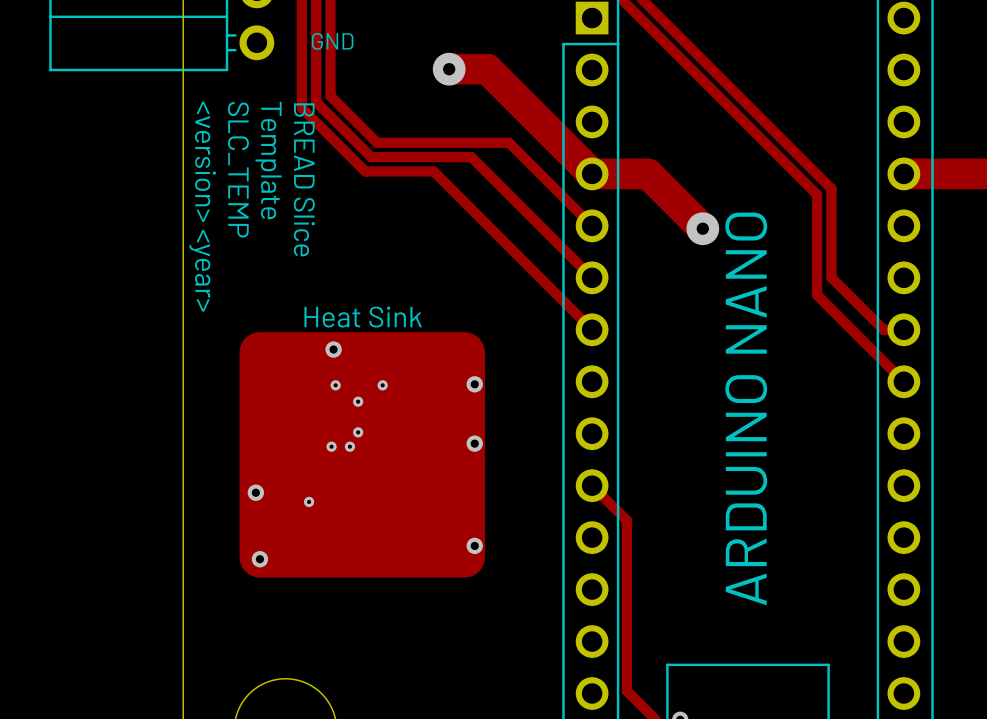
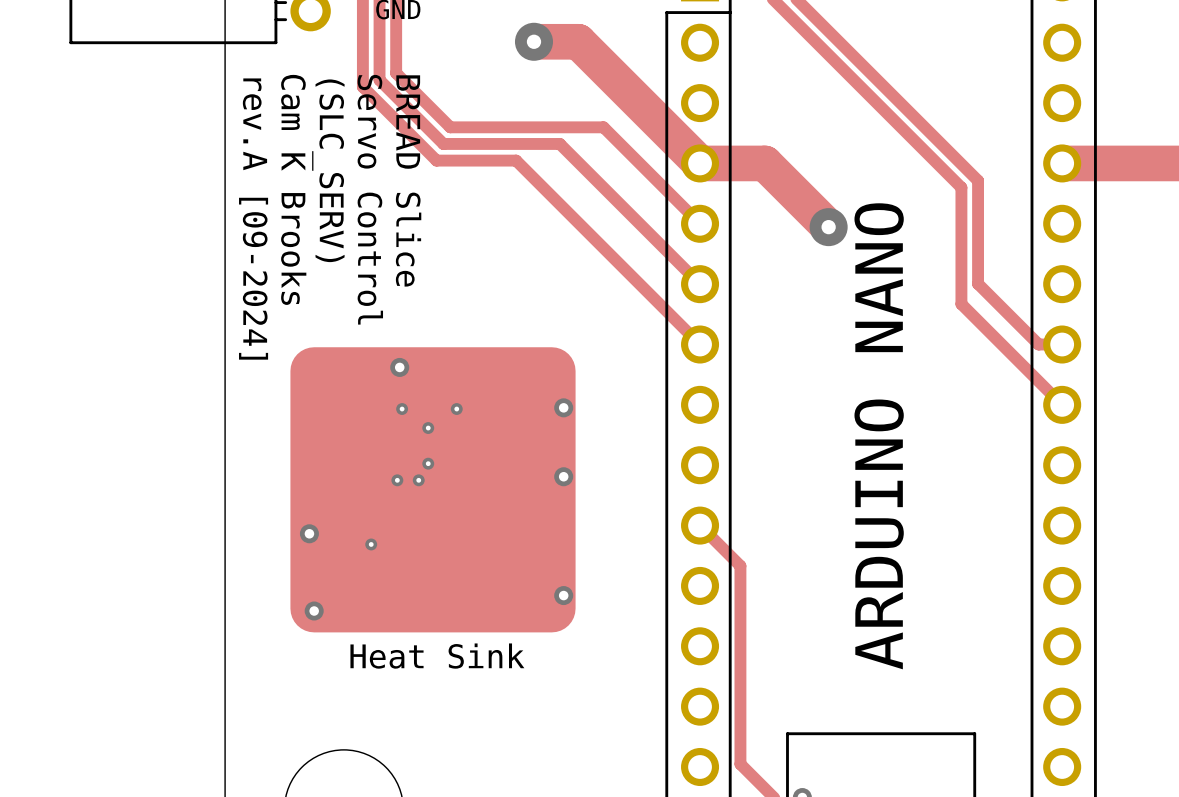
text: Template (268, 160) -> (SLC_SERV) (328, 170)
text: SLC_TEMP (238, 169) -> Cam K Brooks (293, 189)
text position: BREAD Slice (304, 179) -> BREAD Slice (408, 180)
text: none -> Servo Control (370, 199)
text: <version> <year> (202, 206) -> rev.A [09-2024] (253, 219)
part text position: Heat Sink (363, 317) -> Heat Sink (437, 656)

